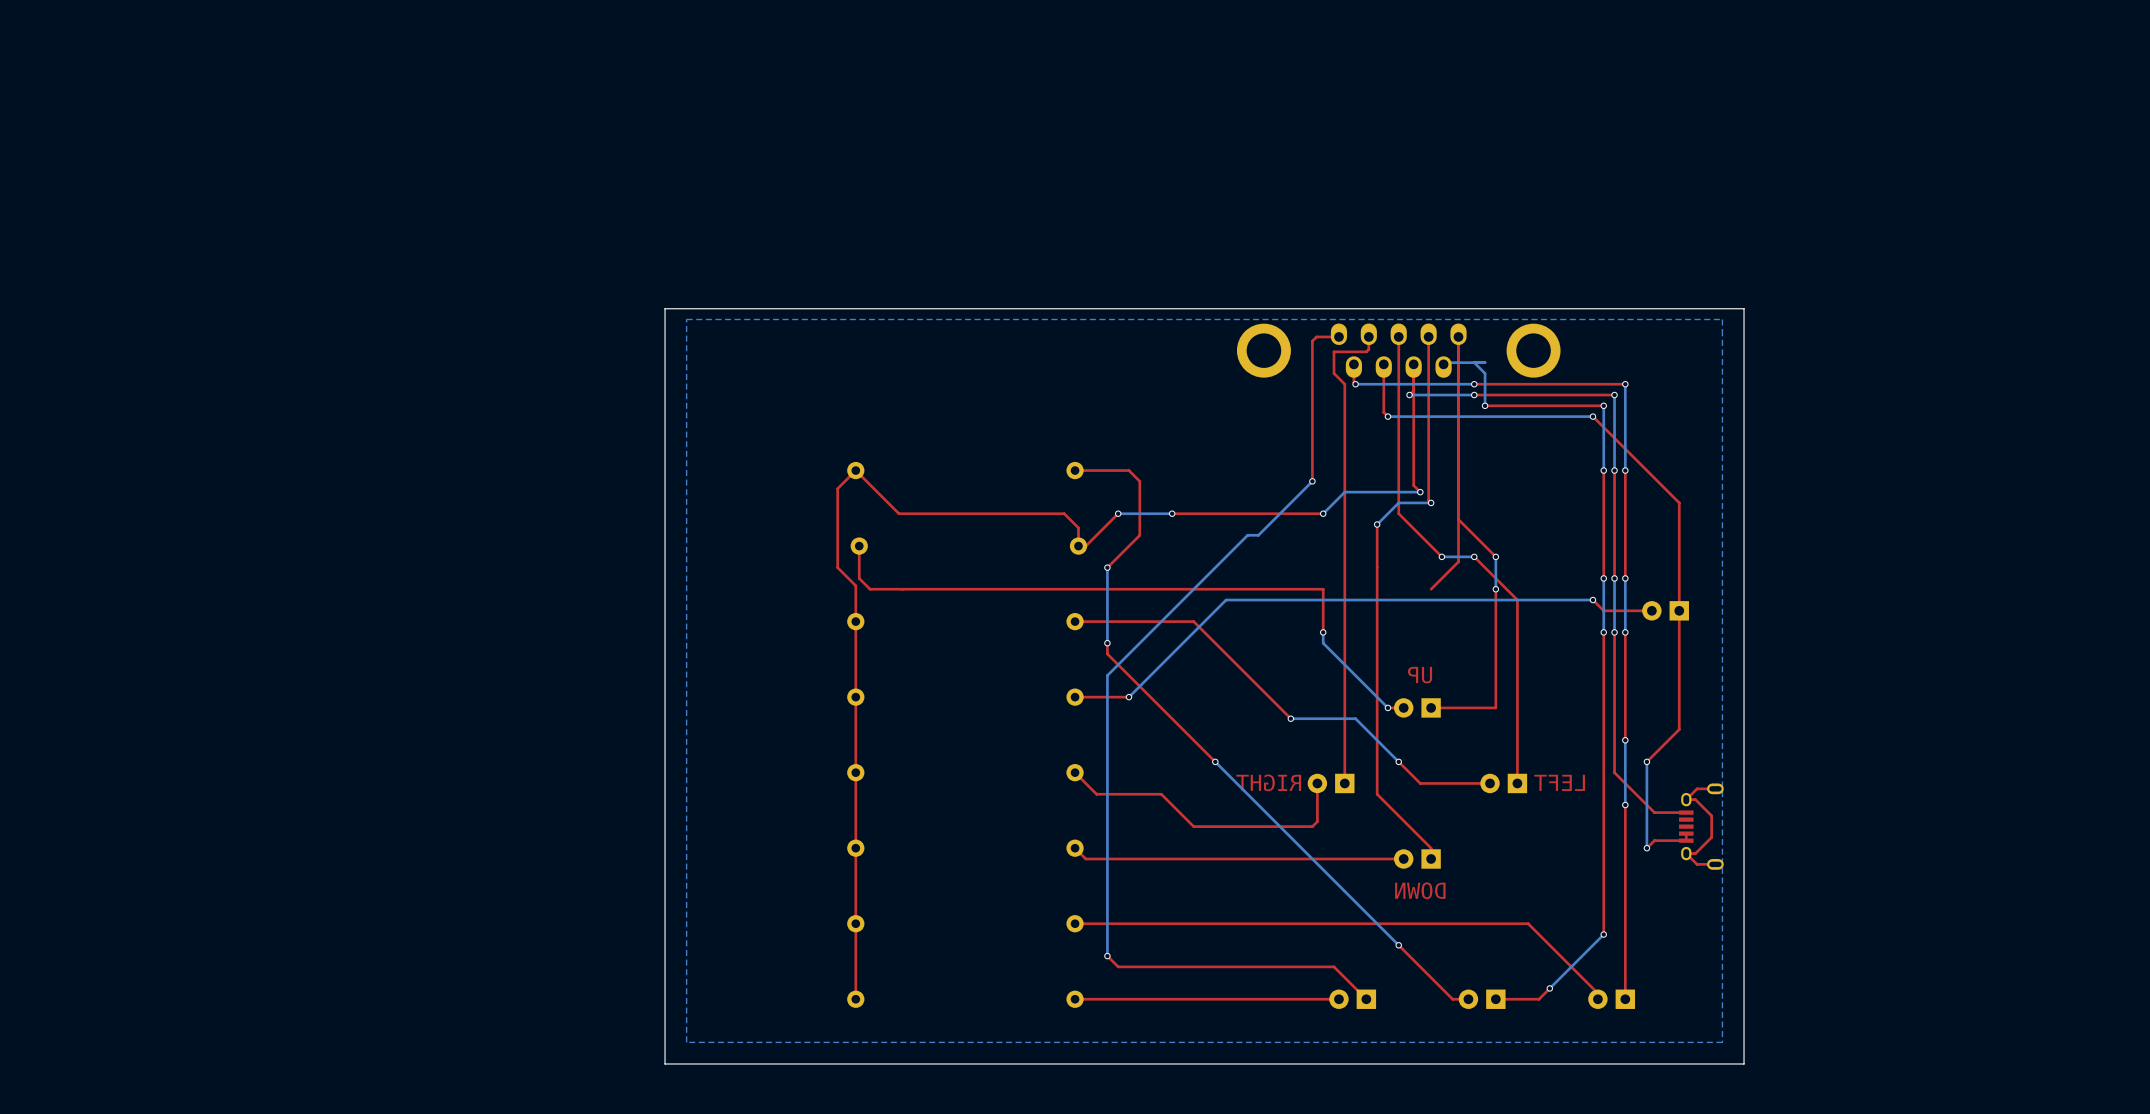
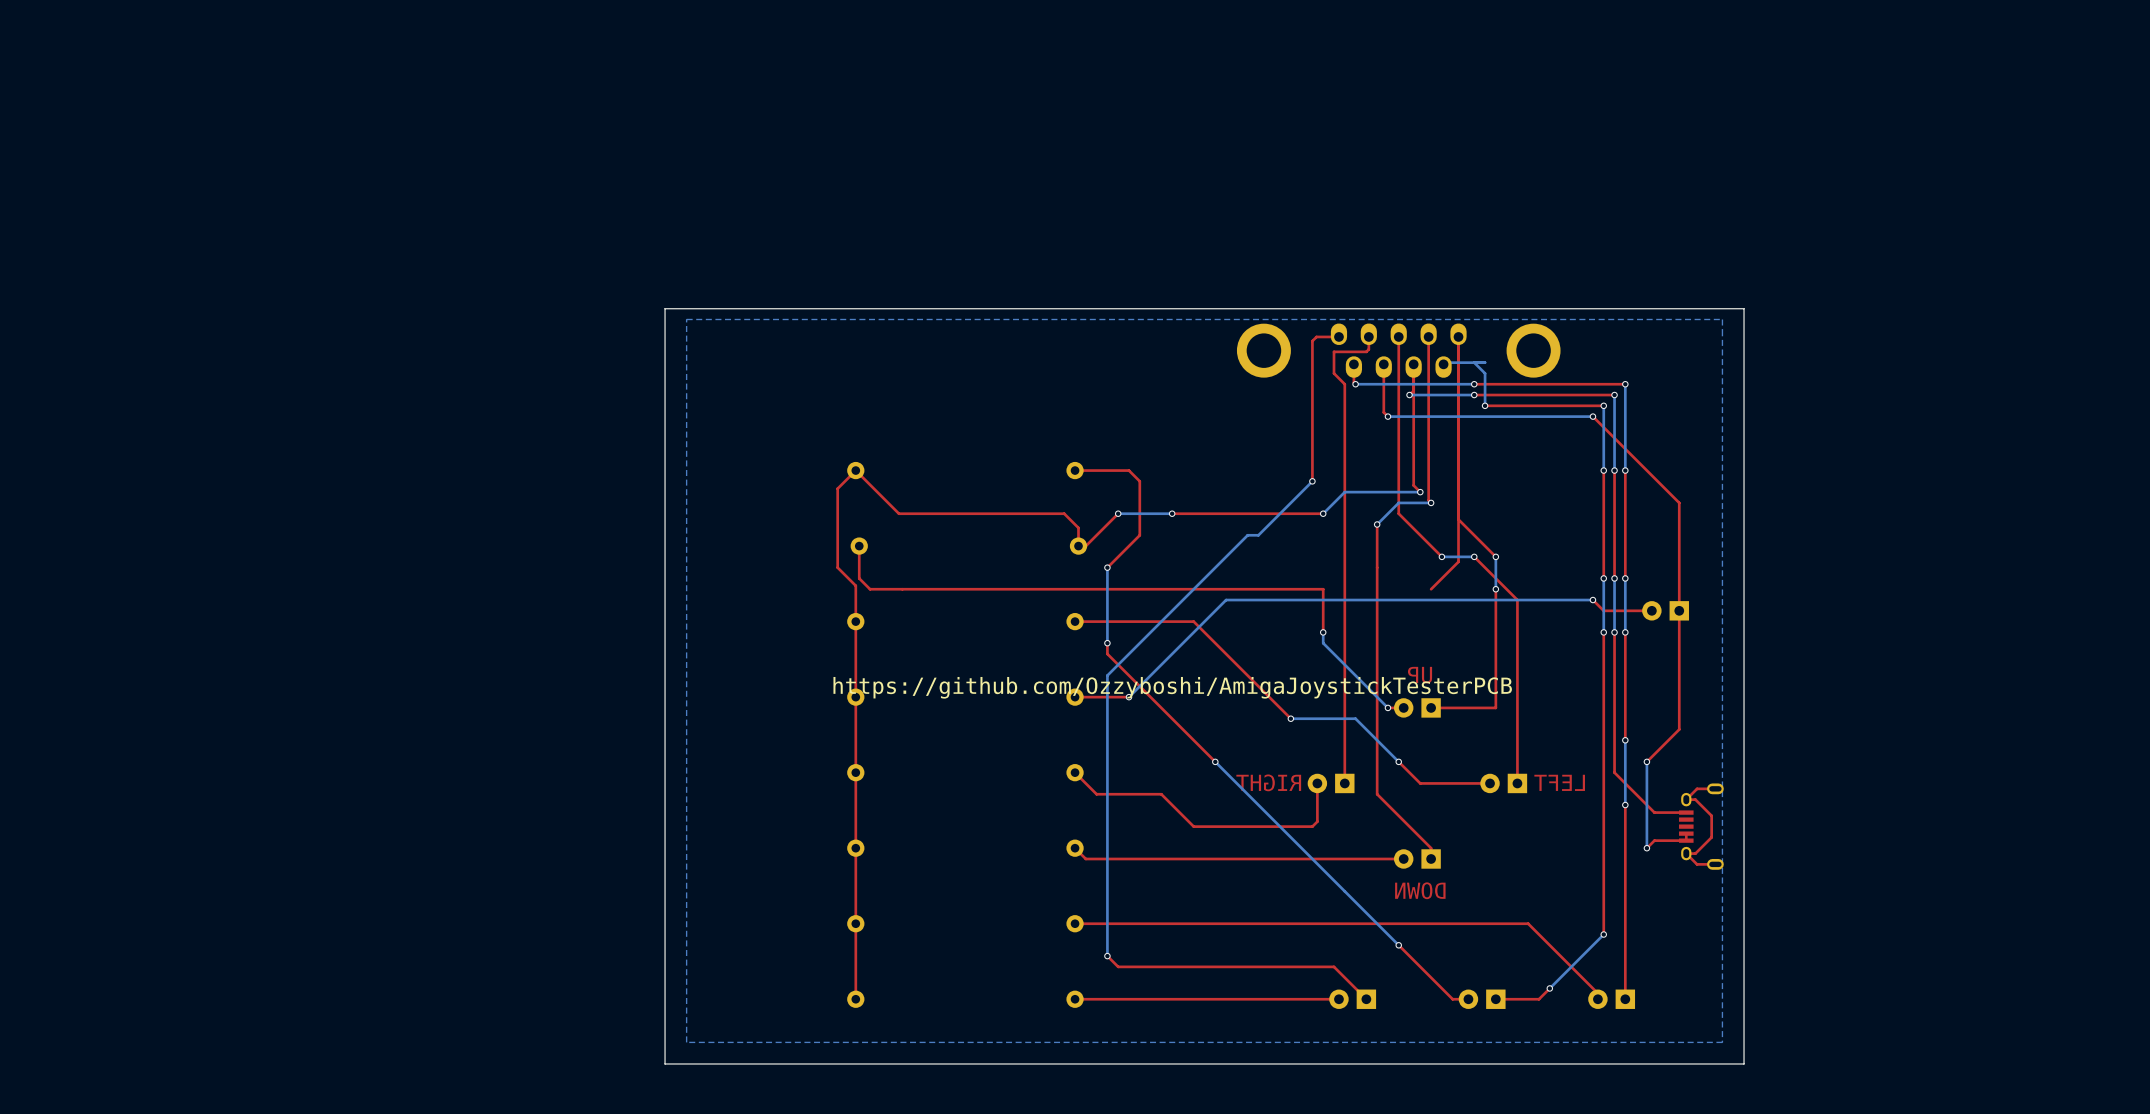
text: none -> https://github.com/Ozzyboshi/AmigaJoystickTesterPCB (1172, 687)

